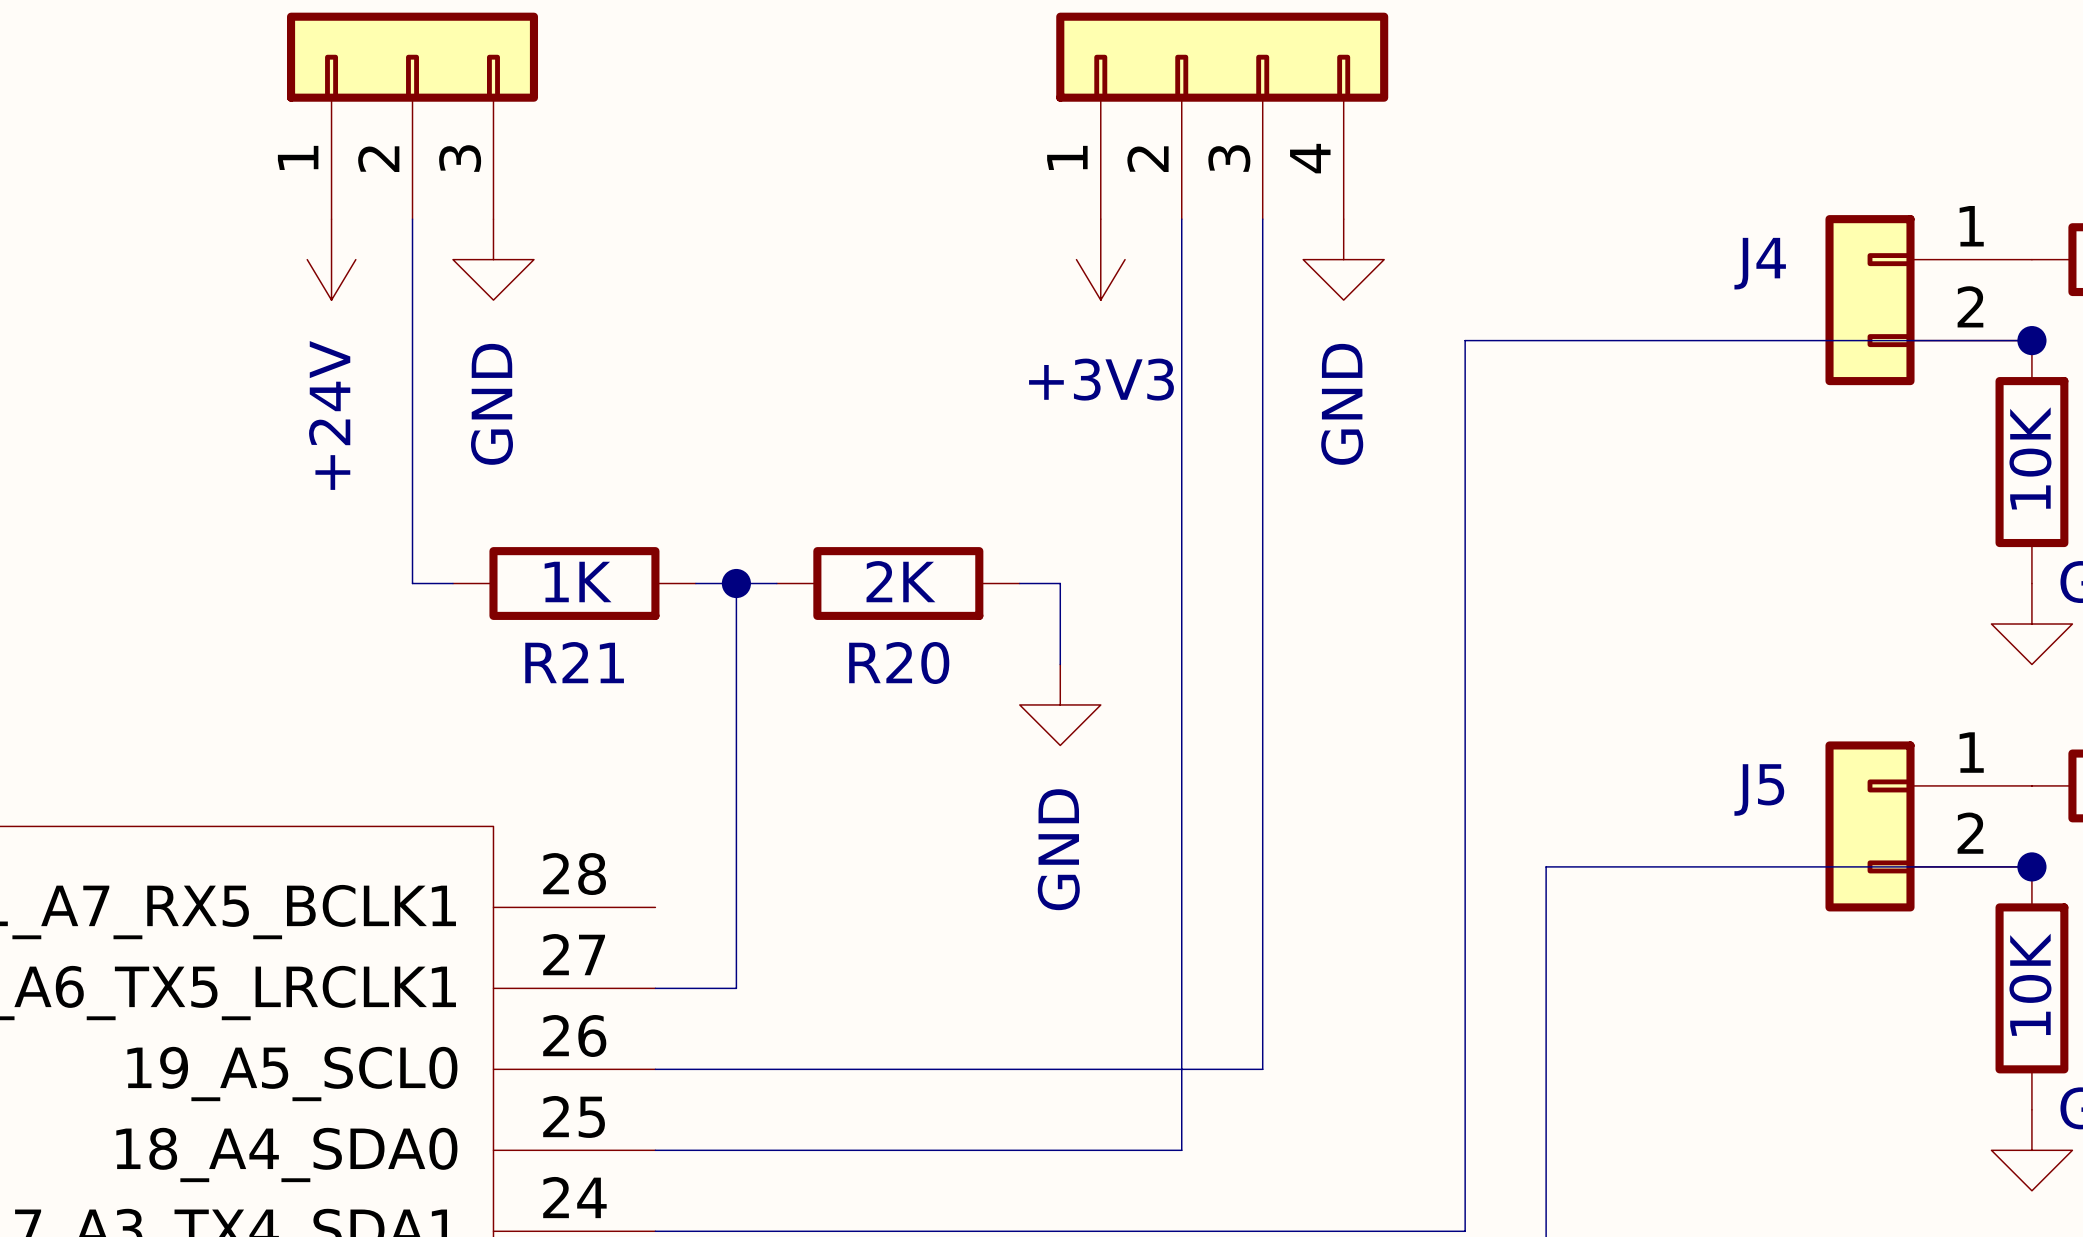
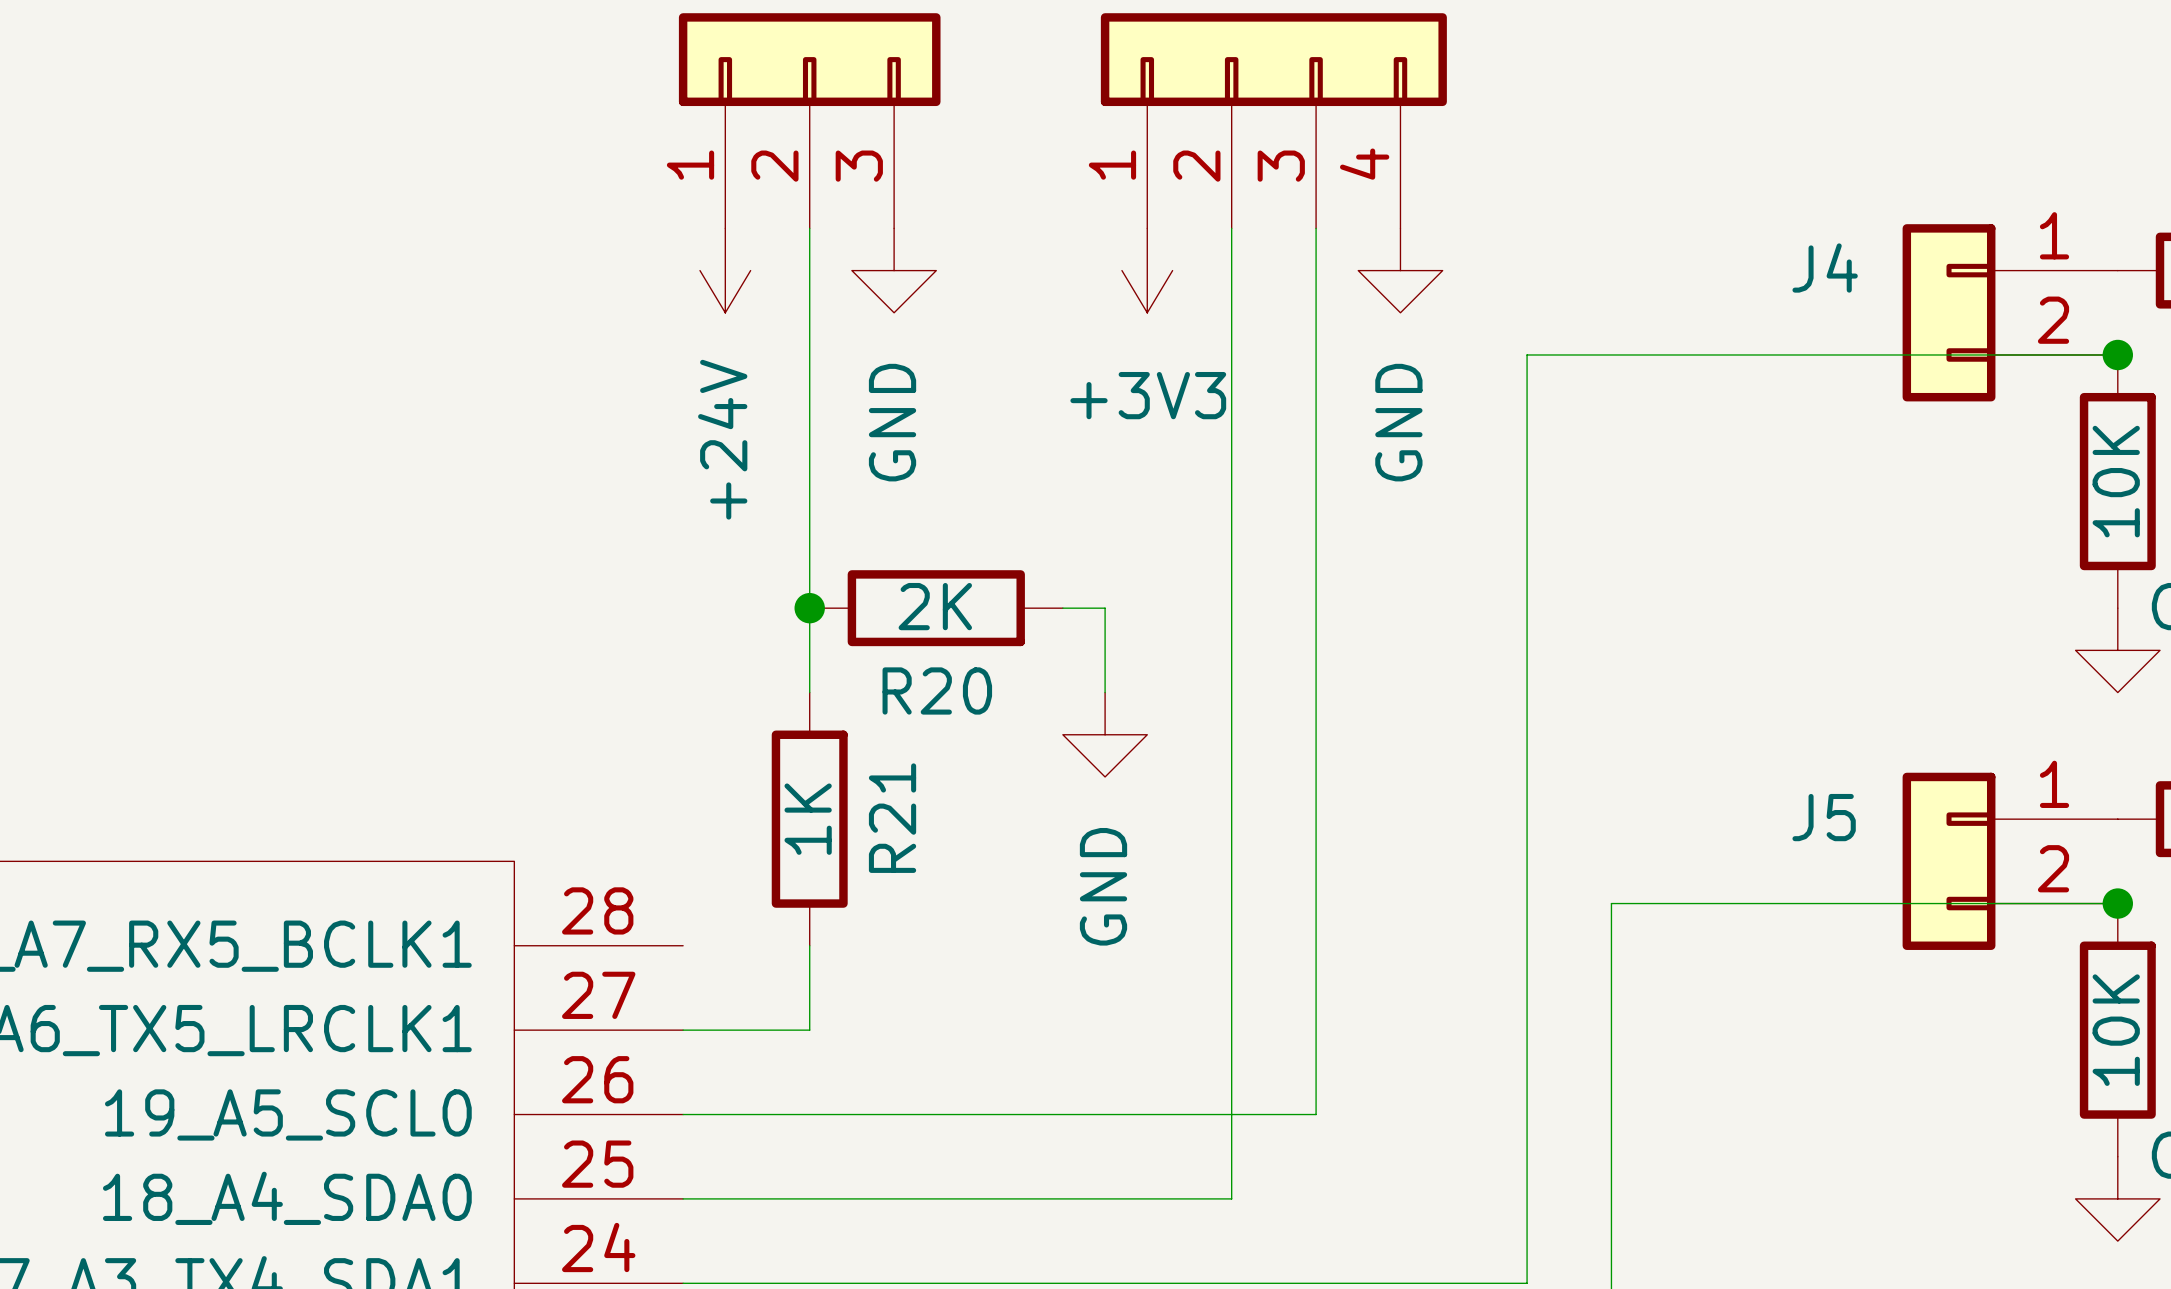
part position: (412, 115) -> (809, 120)
wire: (412, 219) (412, 583) (452, 583) -> none
wire: none -> (809, 228) (809, 692)
power symbol position: +24V (331, 259) -> +24V (725, 270)
power symbol position: GND (493, 259) -> GND (894, 270)
R21 rotation: 0° (574, 583) -> 90° clockwise (809, 819)
R21 position: (574, 583) -> (809, 819)
wire: (695, 583) (776, 583) -> none
wire: (736, 583) (736, 988) -> (809, 945) (809, 1030) (767, 1030)
junction position: (736, 583) -> (809, 608)
R21 name position: R21 (574, 662) -> R21 (892, 818)

